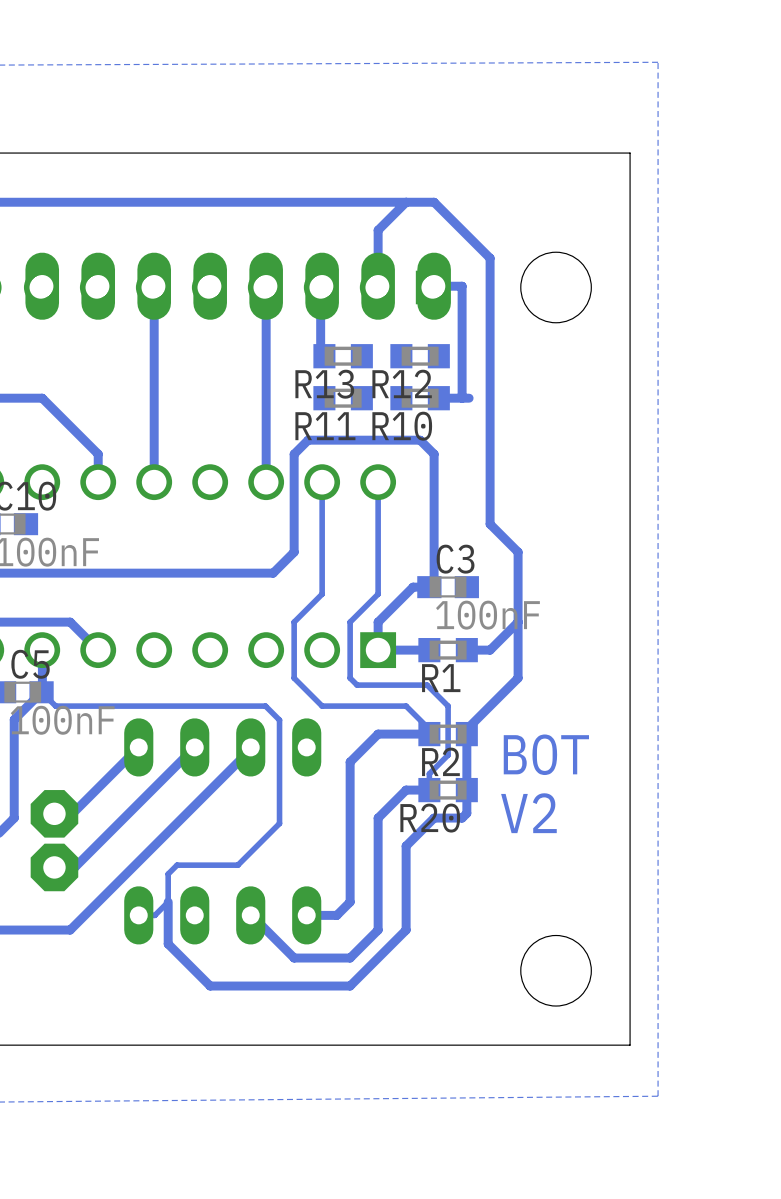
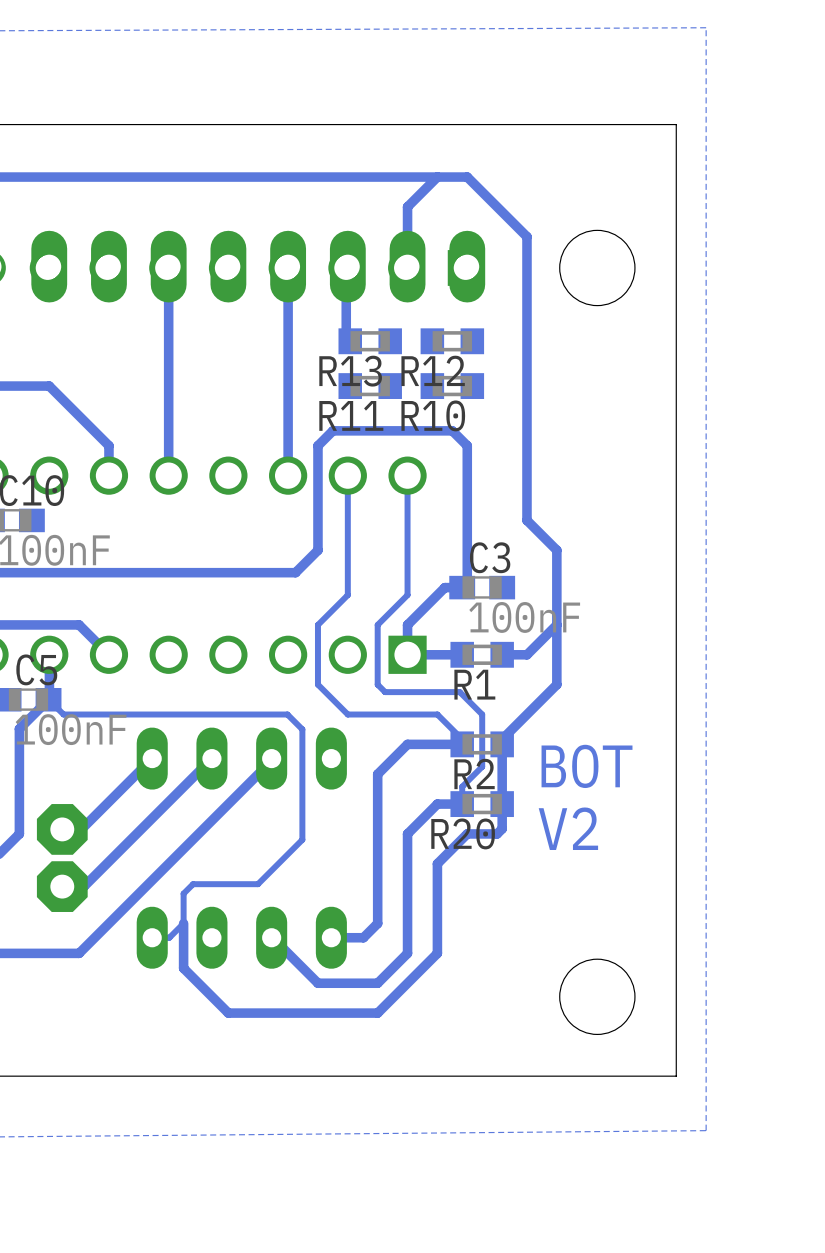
track: (434, 286) (462, 286) (462, 398) -> none
track: (469, 398) (438, 398) -> none

